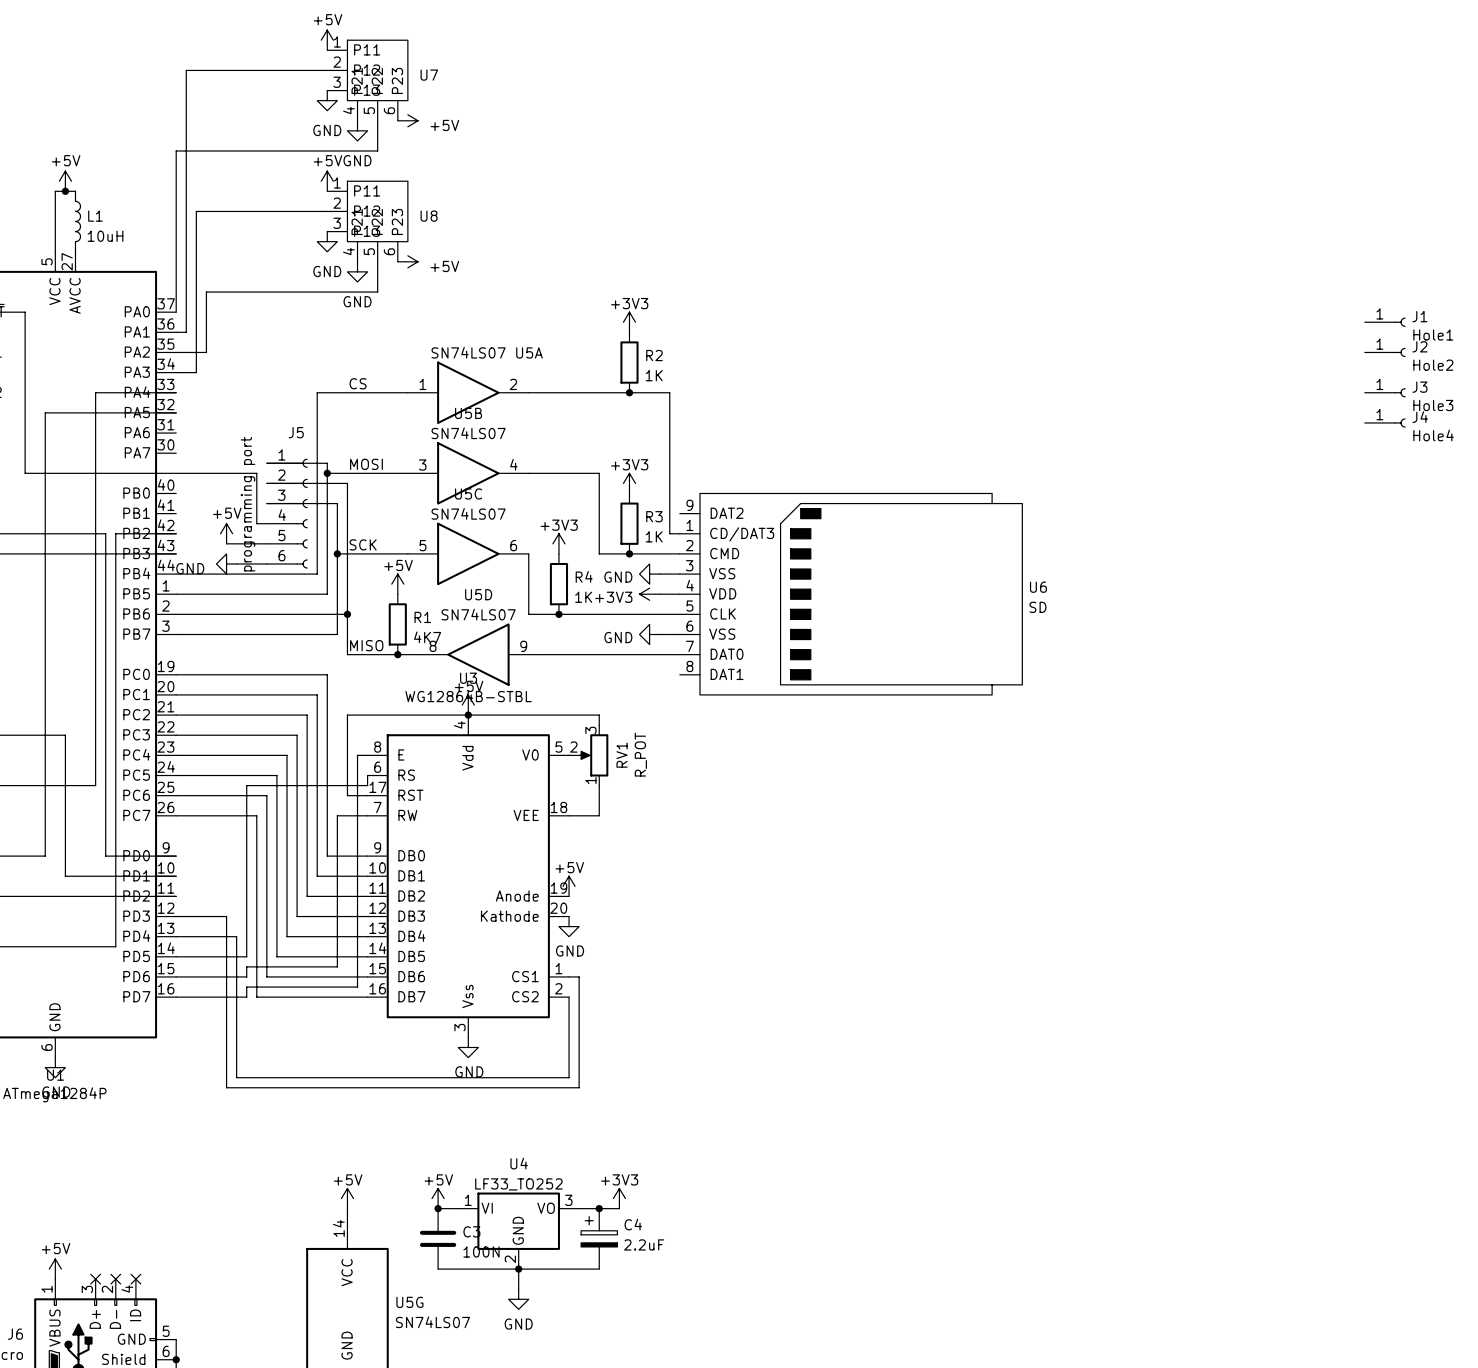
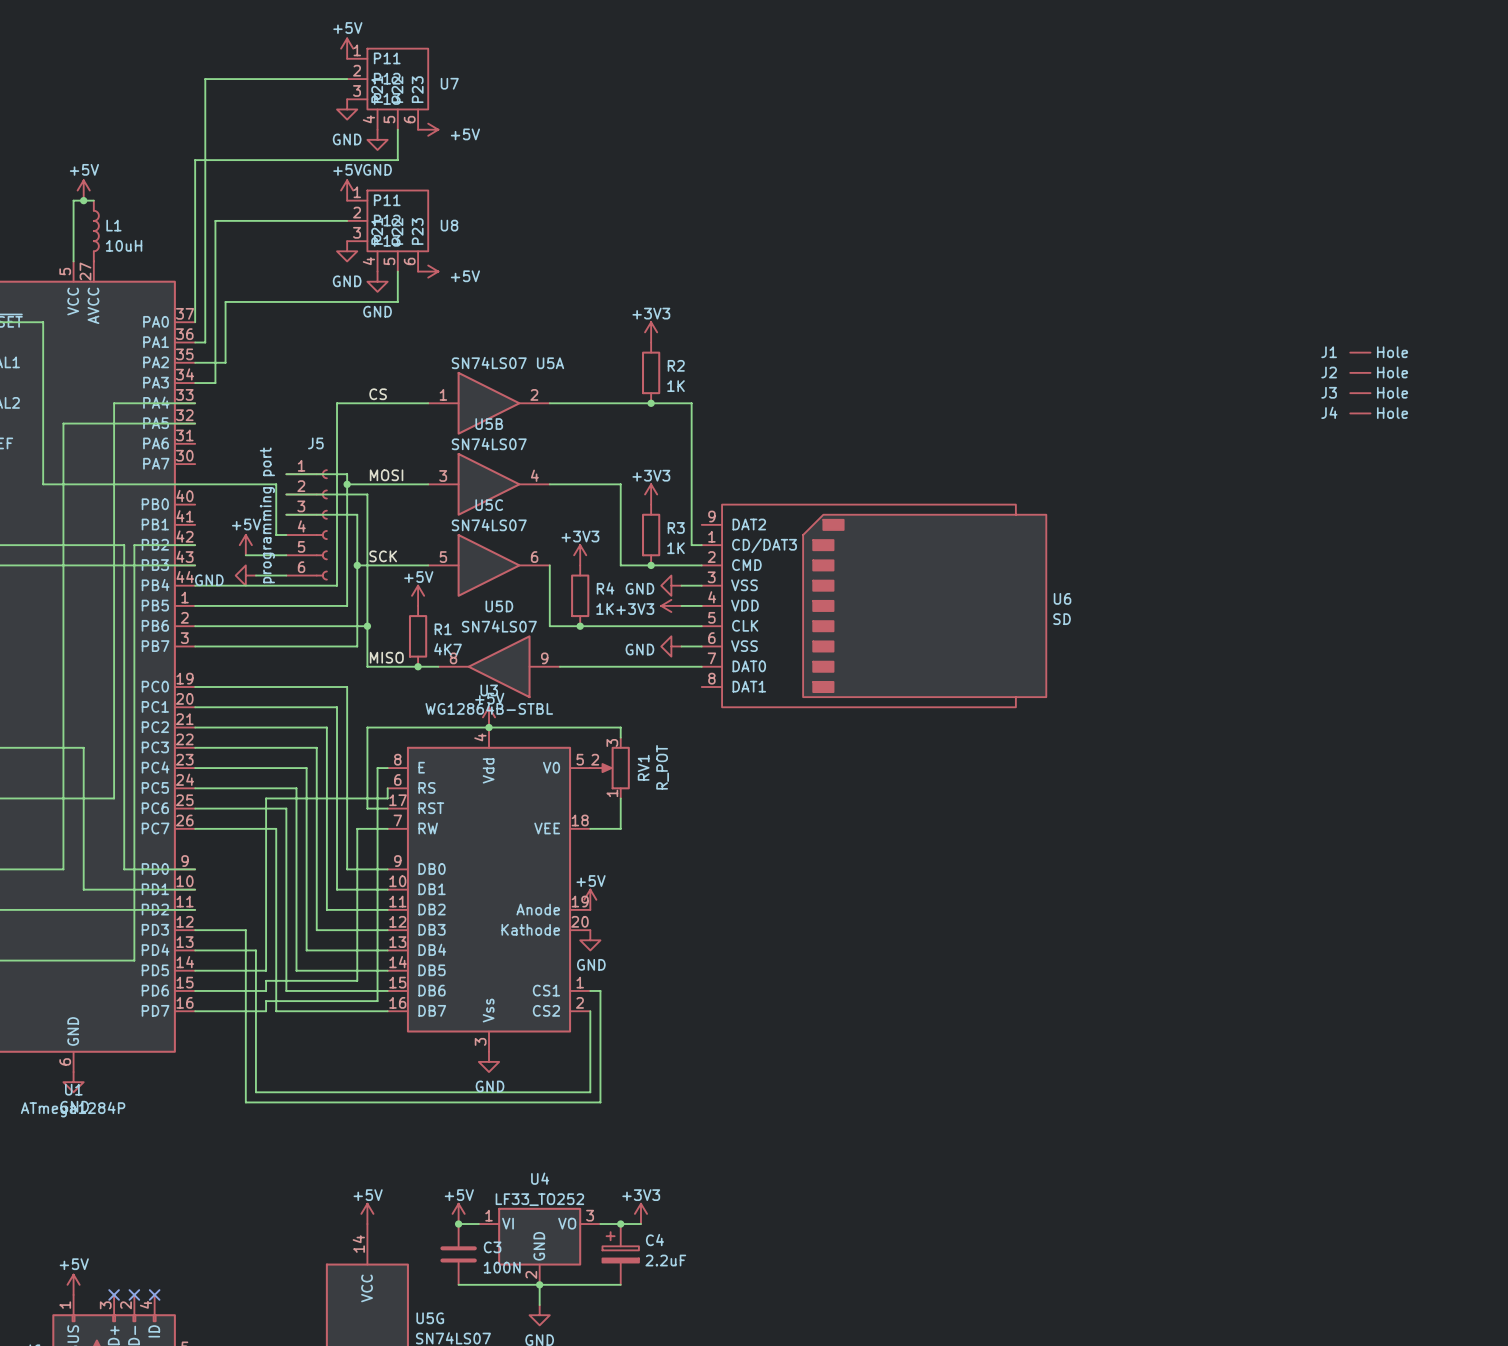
J1 name position: J1 (1419, 316) -> J1 (1329, 352)
J1 symbol: [1364, 317, 1406, 327] -> [1350, 352, 1371, 353]
J1 value: Hole1 (1433, 334) -> none
J2 name position: J2 (1419, 346) -> J2 (1329, 372)
J2 symbol: [1364, 347, 1406, 358] -> [1350, 372, 1371, 373]
J2 value: Hole2 (1433, 365) -> none
J3 name position: J3 (1419, 387) -> J3 (1329, 392)
J3 symbol: [1364, 388, 1406, 398] -> [1350, 393, 1371, 394]
J3 value: Hole3 (1433, 405) -> none
J4 name position: J4 (1420, 417) -> J4 (1329, 412)
J4 symbol: [1364, 418, 1406, 428] -> [1350, 413, 1371, 414]
J4 value: Hole4 (1433, 435) -> none

